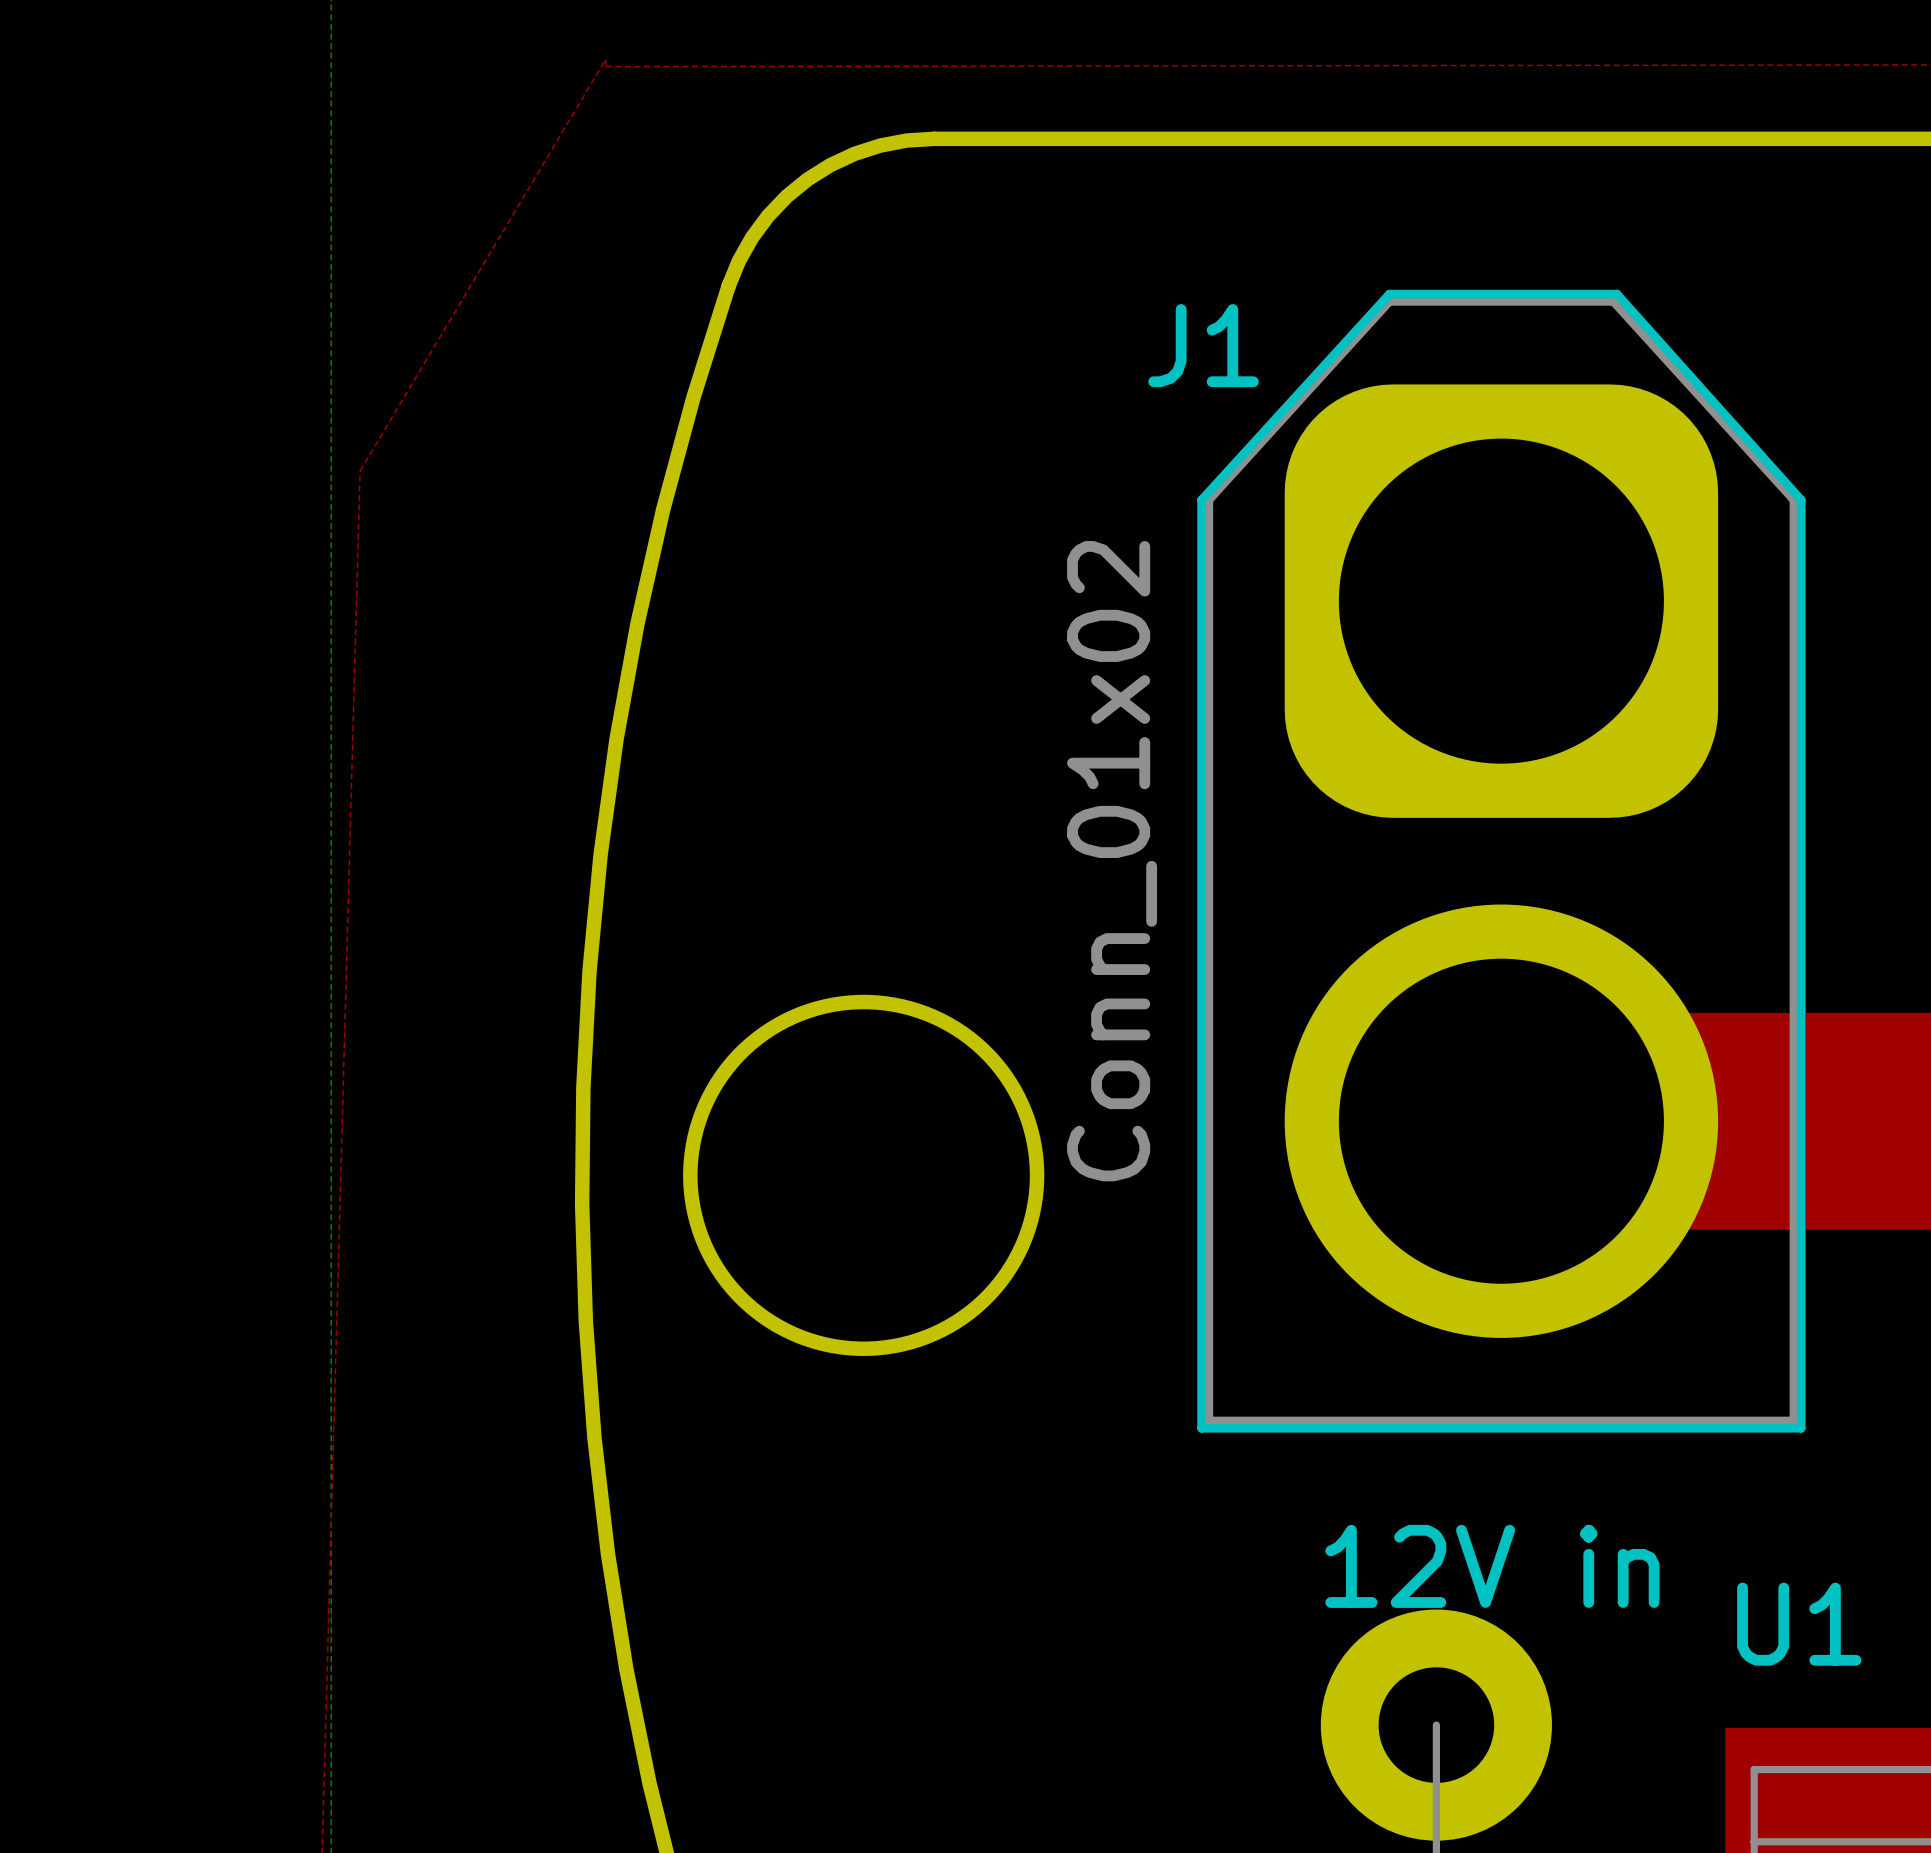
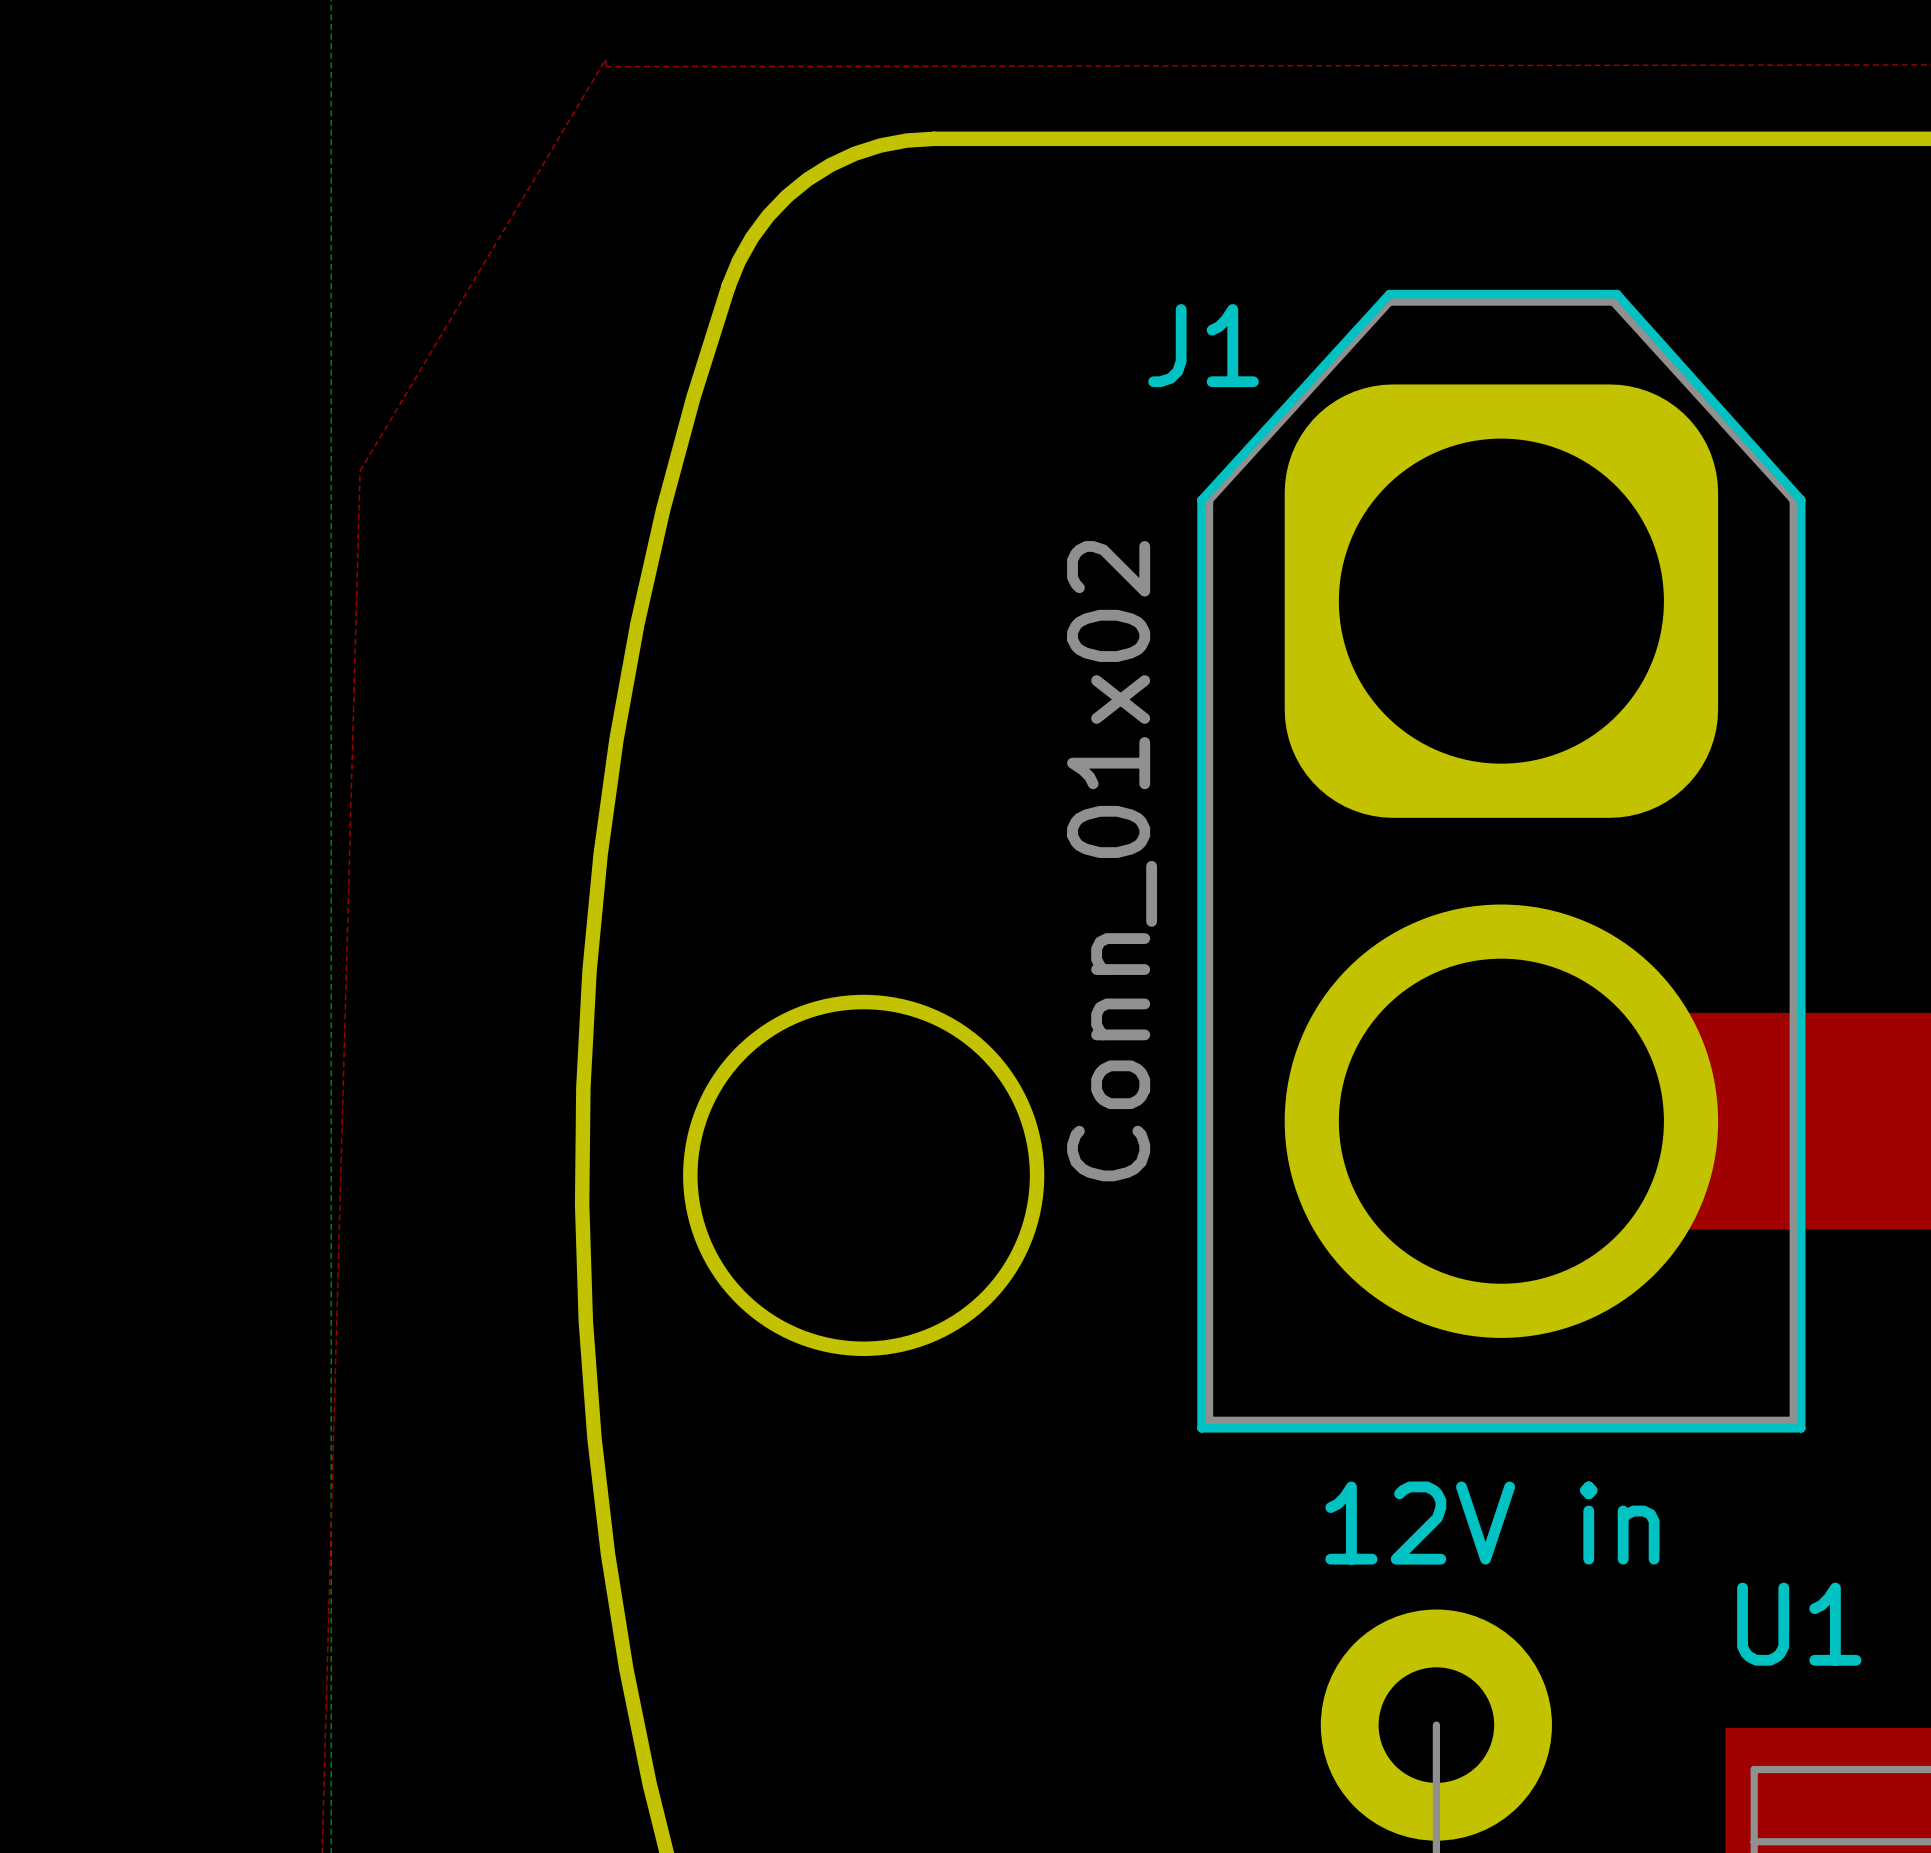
text position: 12V in (1492, 1566) -> 12V in (1492, 1523)

